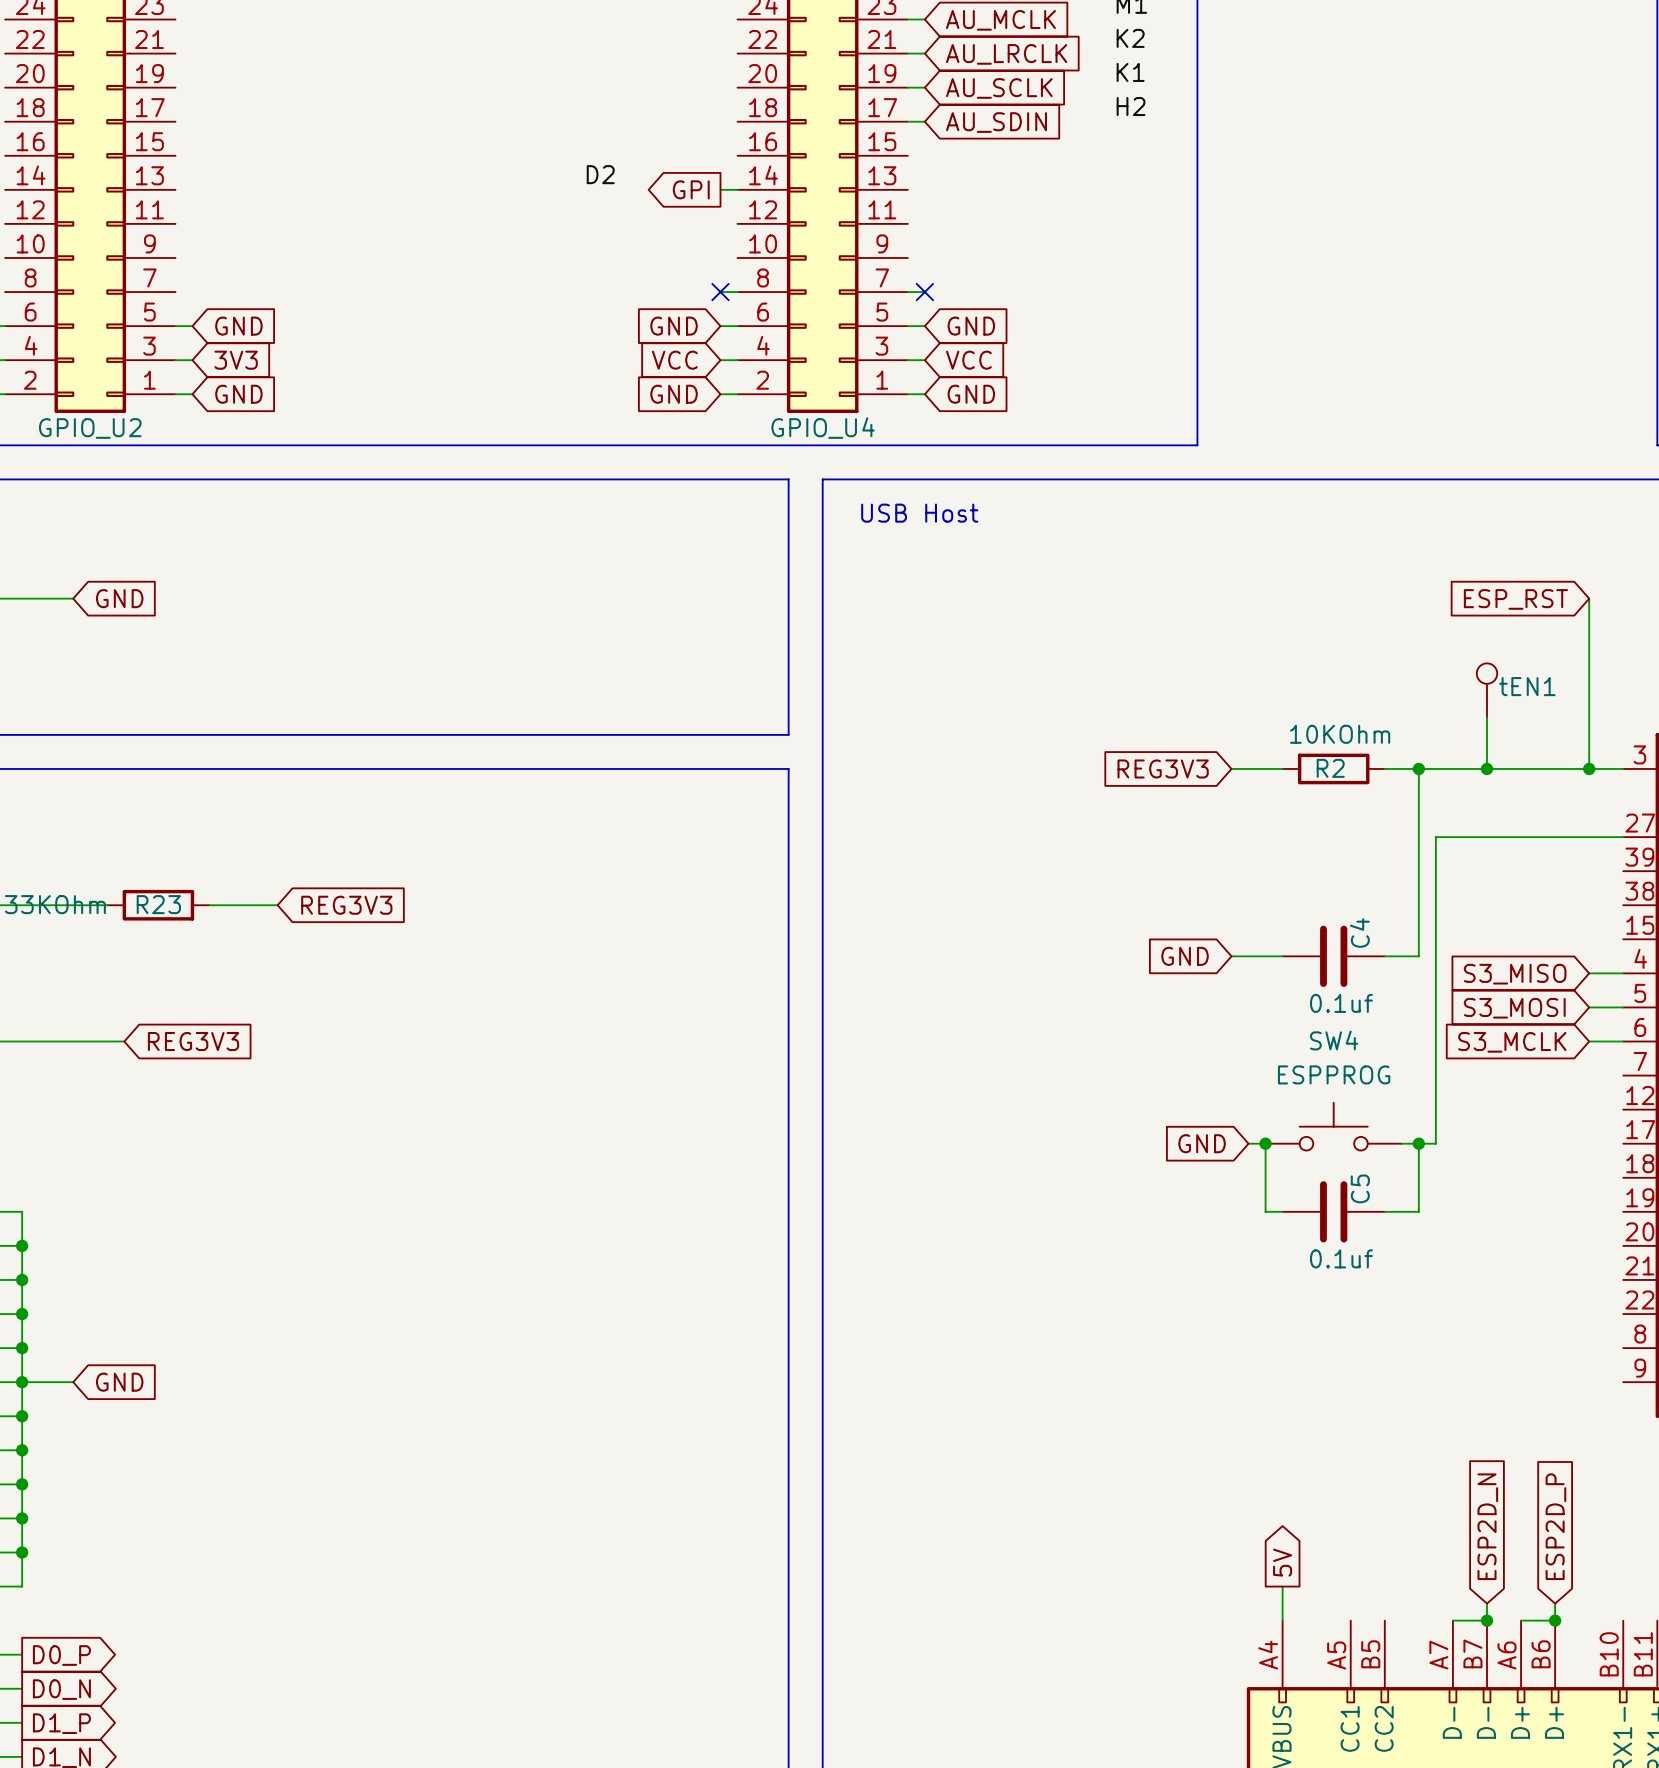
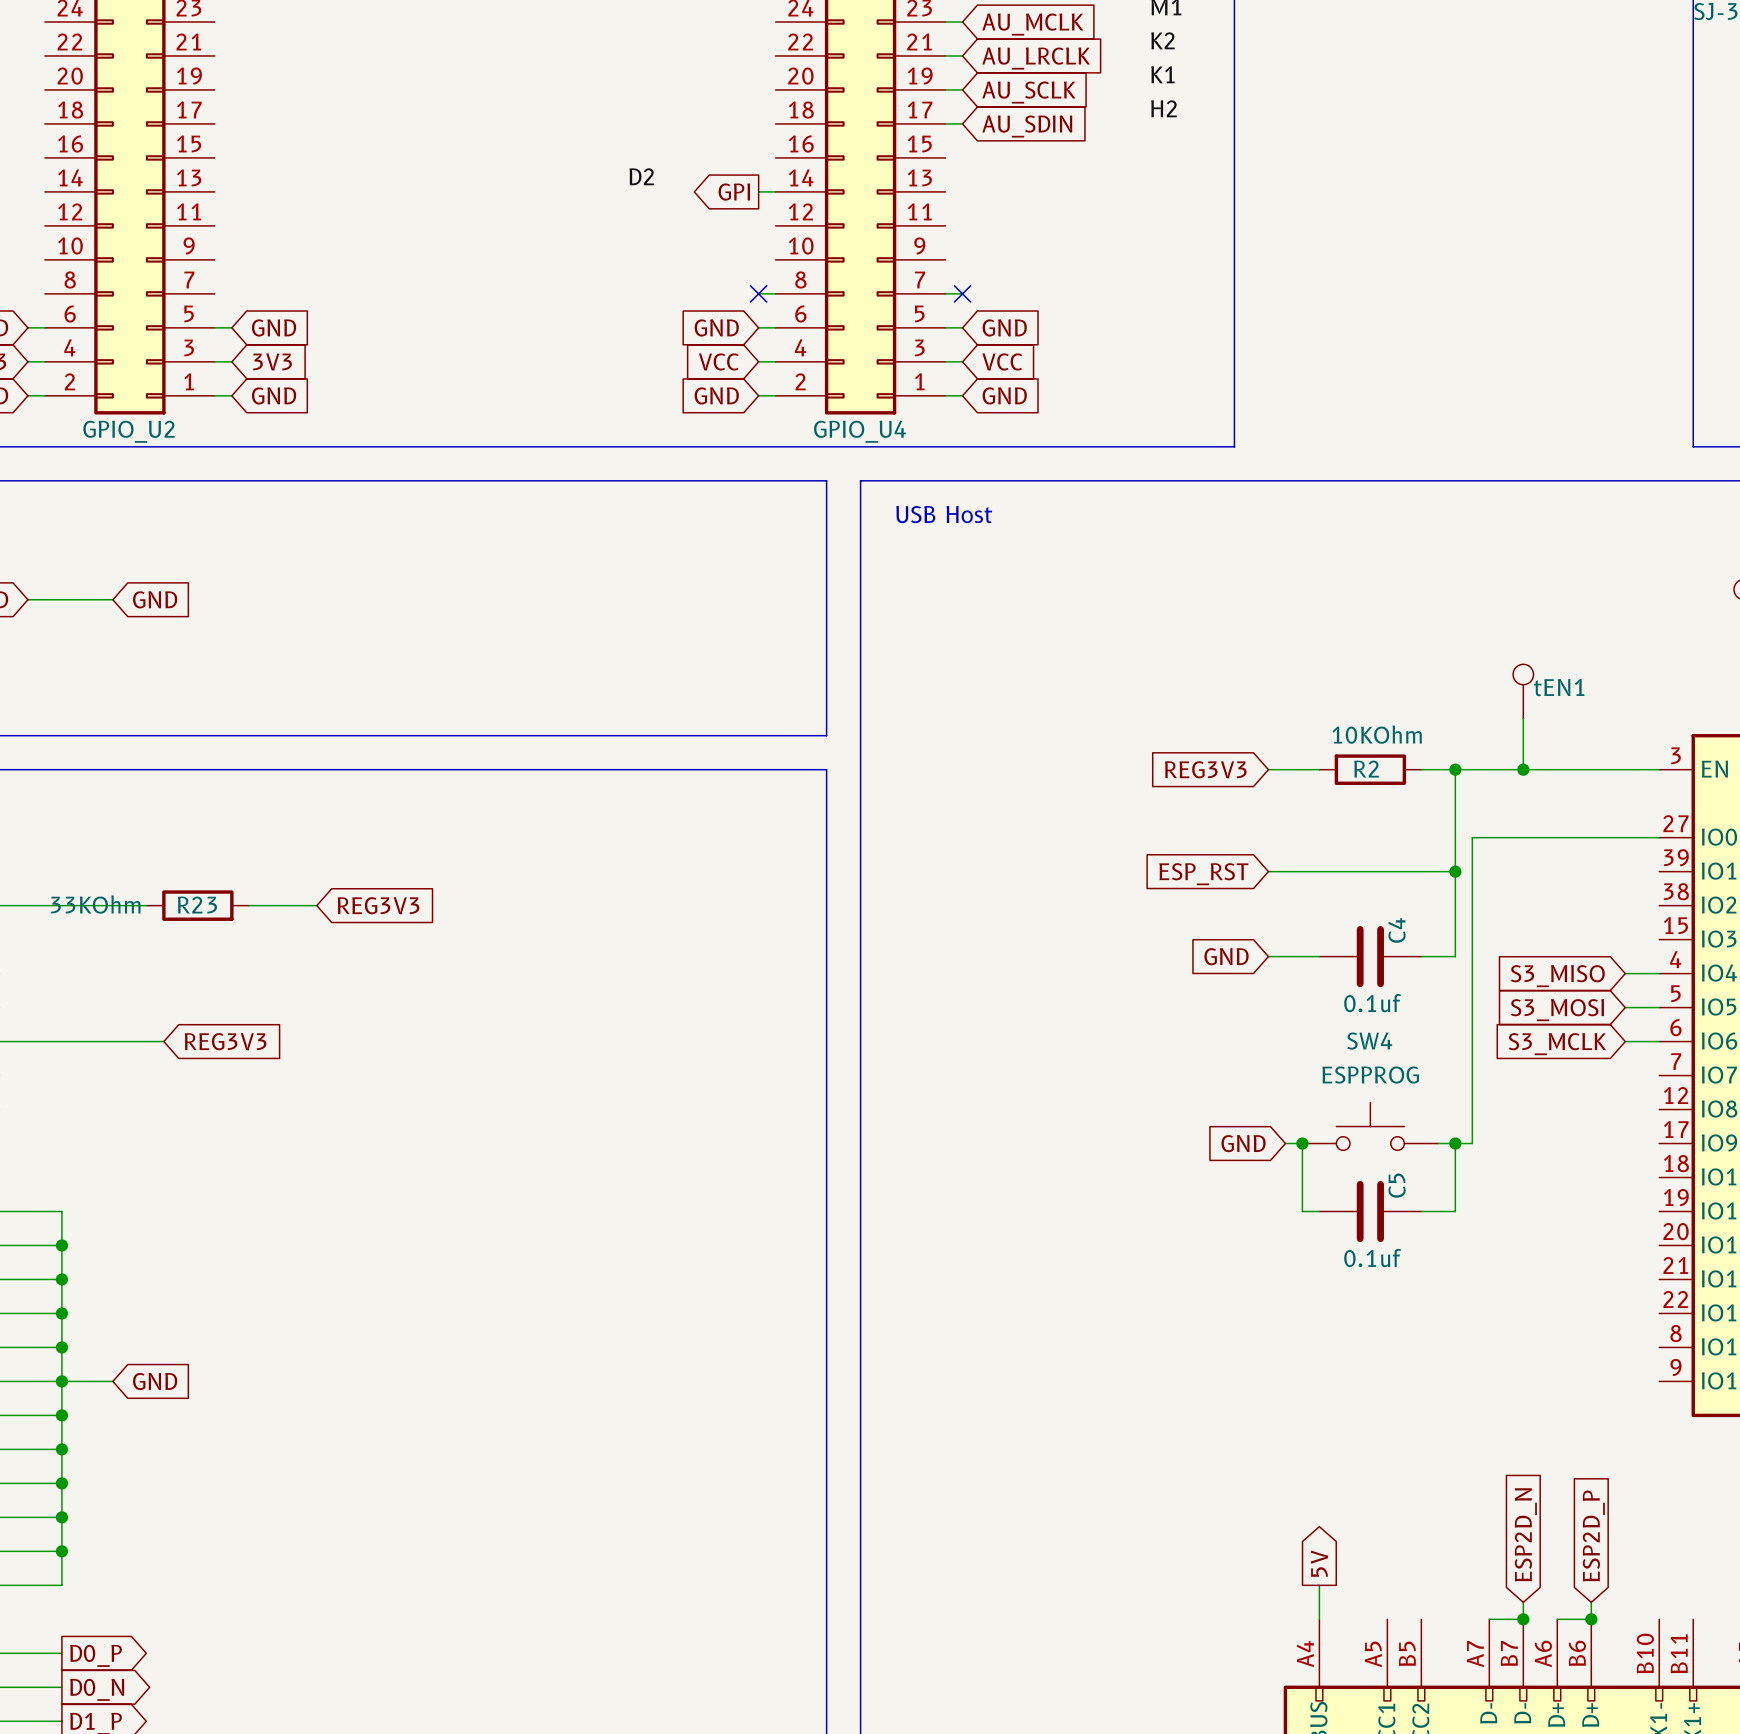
wire: (1589, 598) (1589, 768) -> none
global label: ESP_RST (1515, 599) -> none
junction: (1589, 768) -> none
global label: none -> ESP_RST (1203, 874)
wire: none -> (1268, 871) (1455, 871)
junction: none -> (1455, 871)

